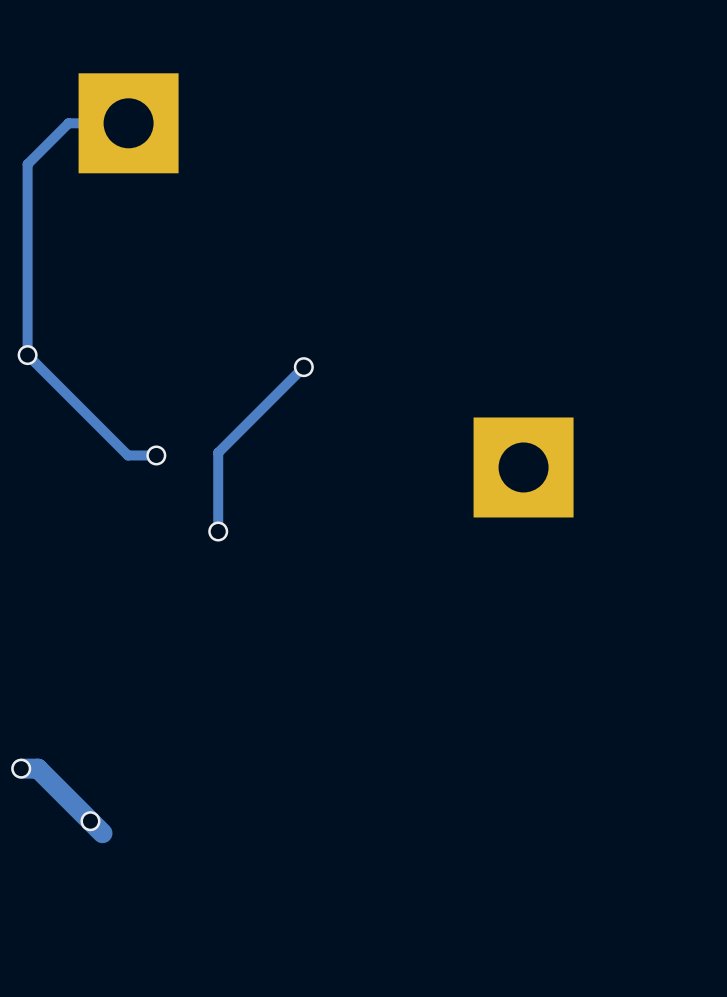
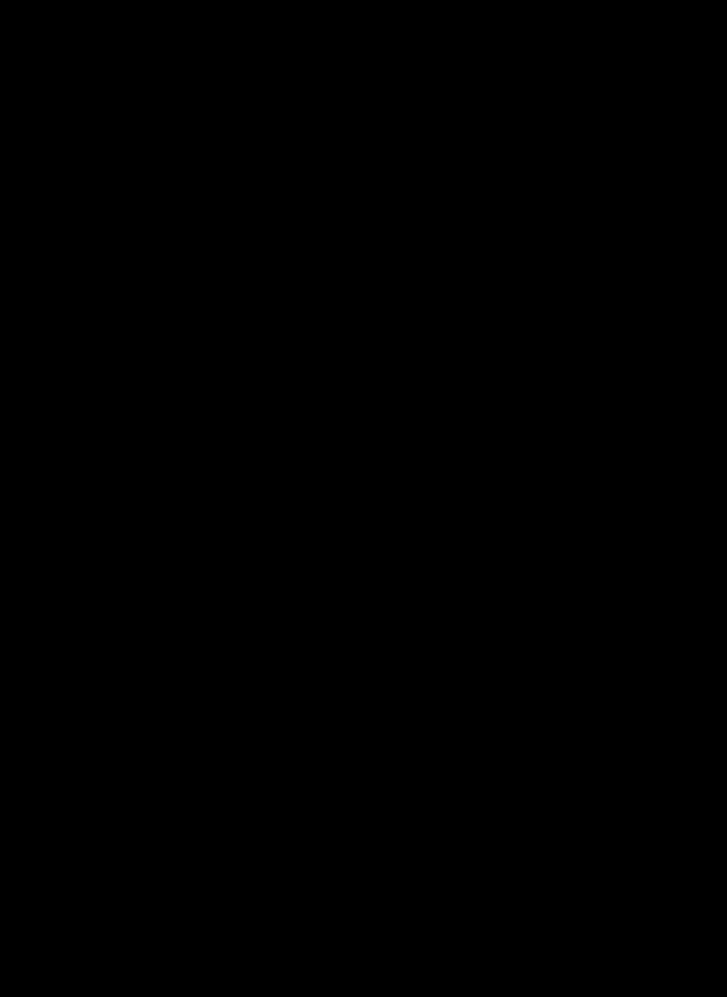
track: (128, 123) (68, 123) (27, 164) (27, 355) (128, 455) (156, 455) -> none
part: (128, 123) -> none
via: (27, 355) -> none
track: (303, 367) (218, 452) (218, 531) -> none
via: (303, 367) -> none
via: (156, 455) -> none
part: (523, 467) -> none
via: (218, 531) -> none
track: (21, 768) (37, 768) (102, 833) -> none
via: (21, 768) -> none
via: (90, 821) -> none

